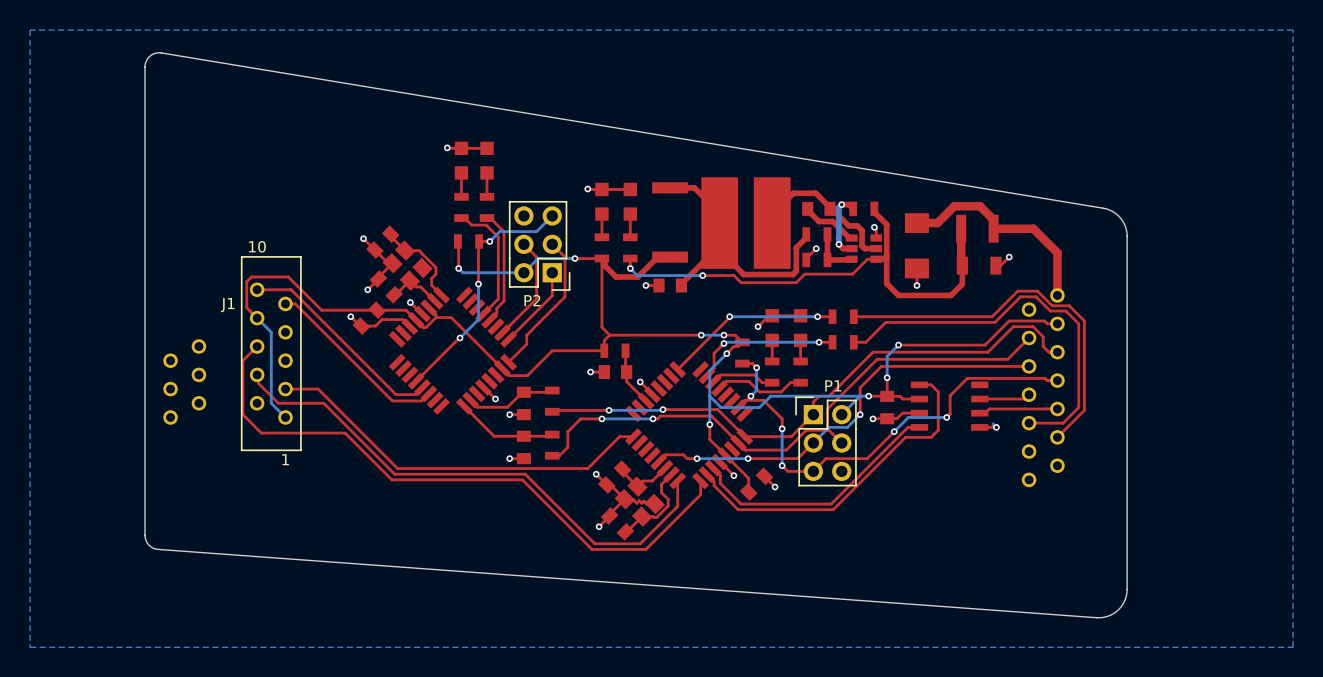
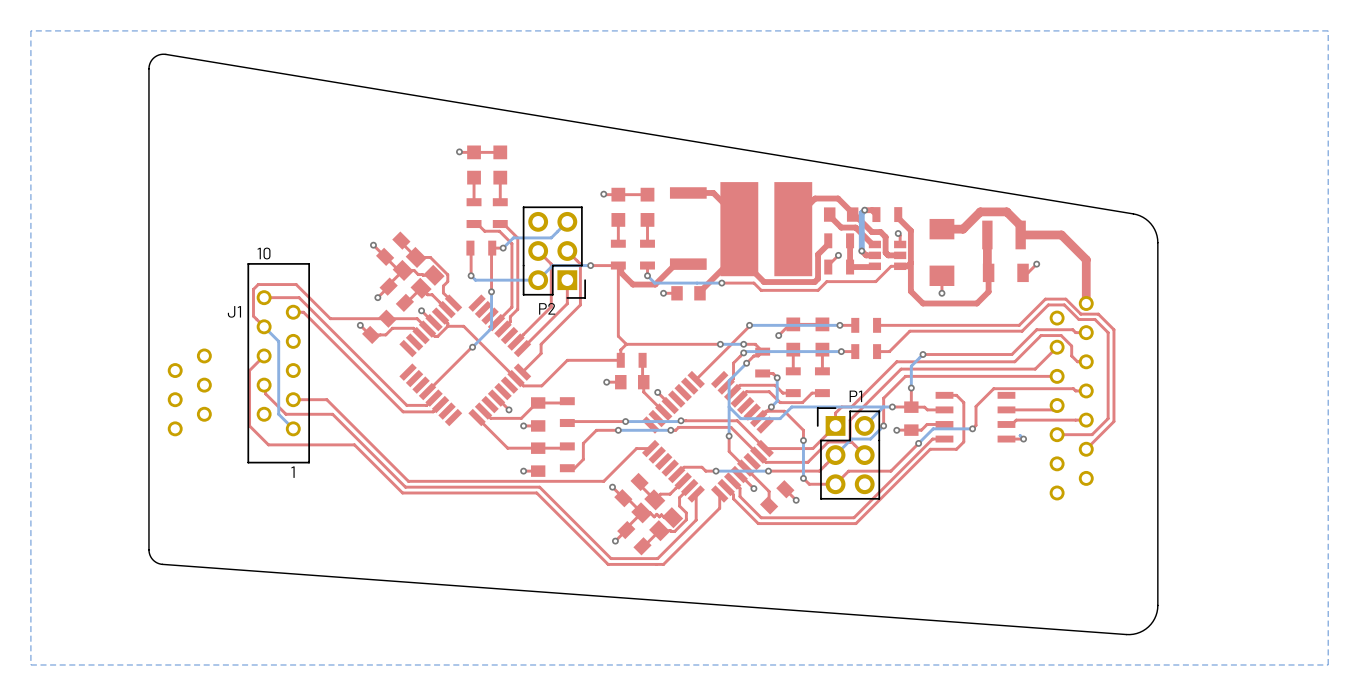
top track: none -> (403, 270) (414, 270) (418, 274) (434, 275)

